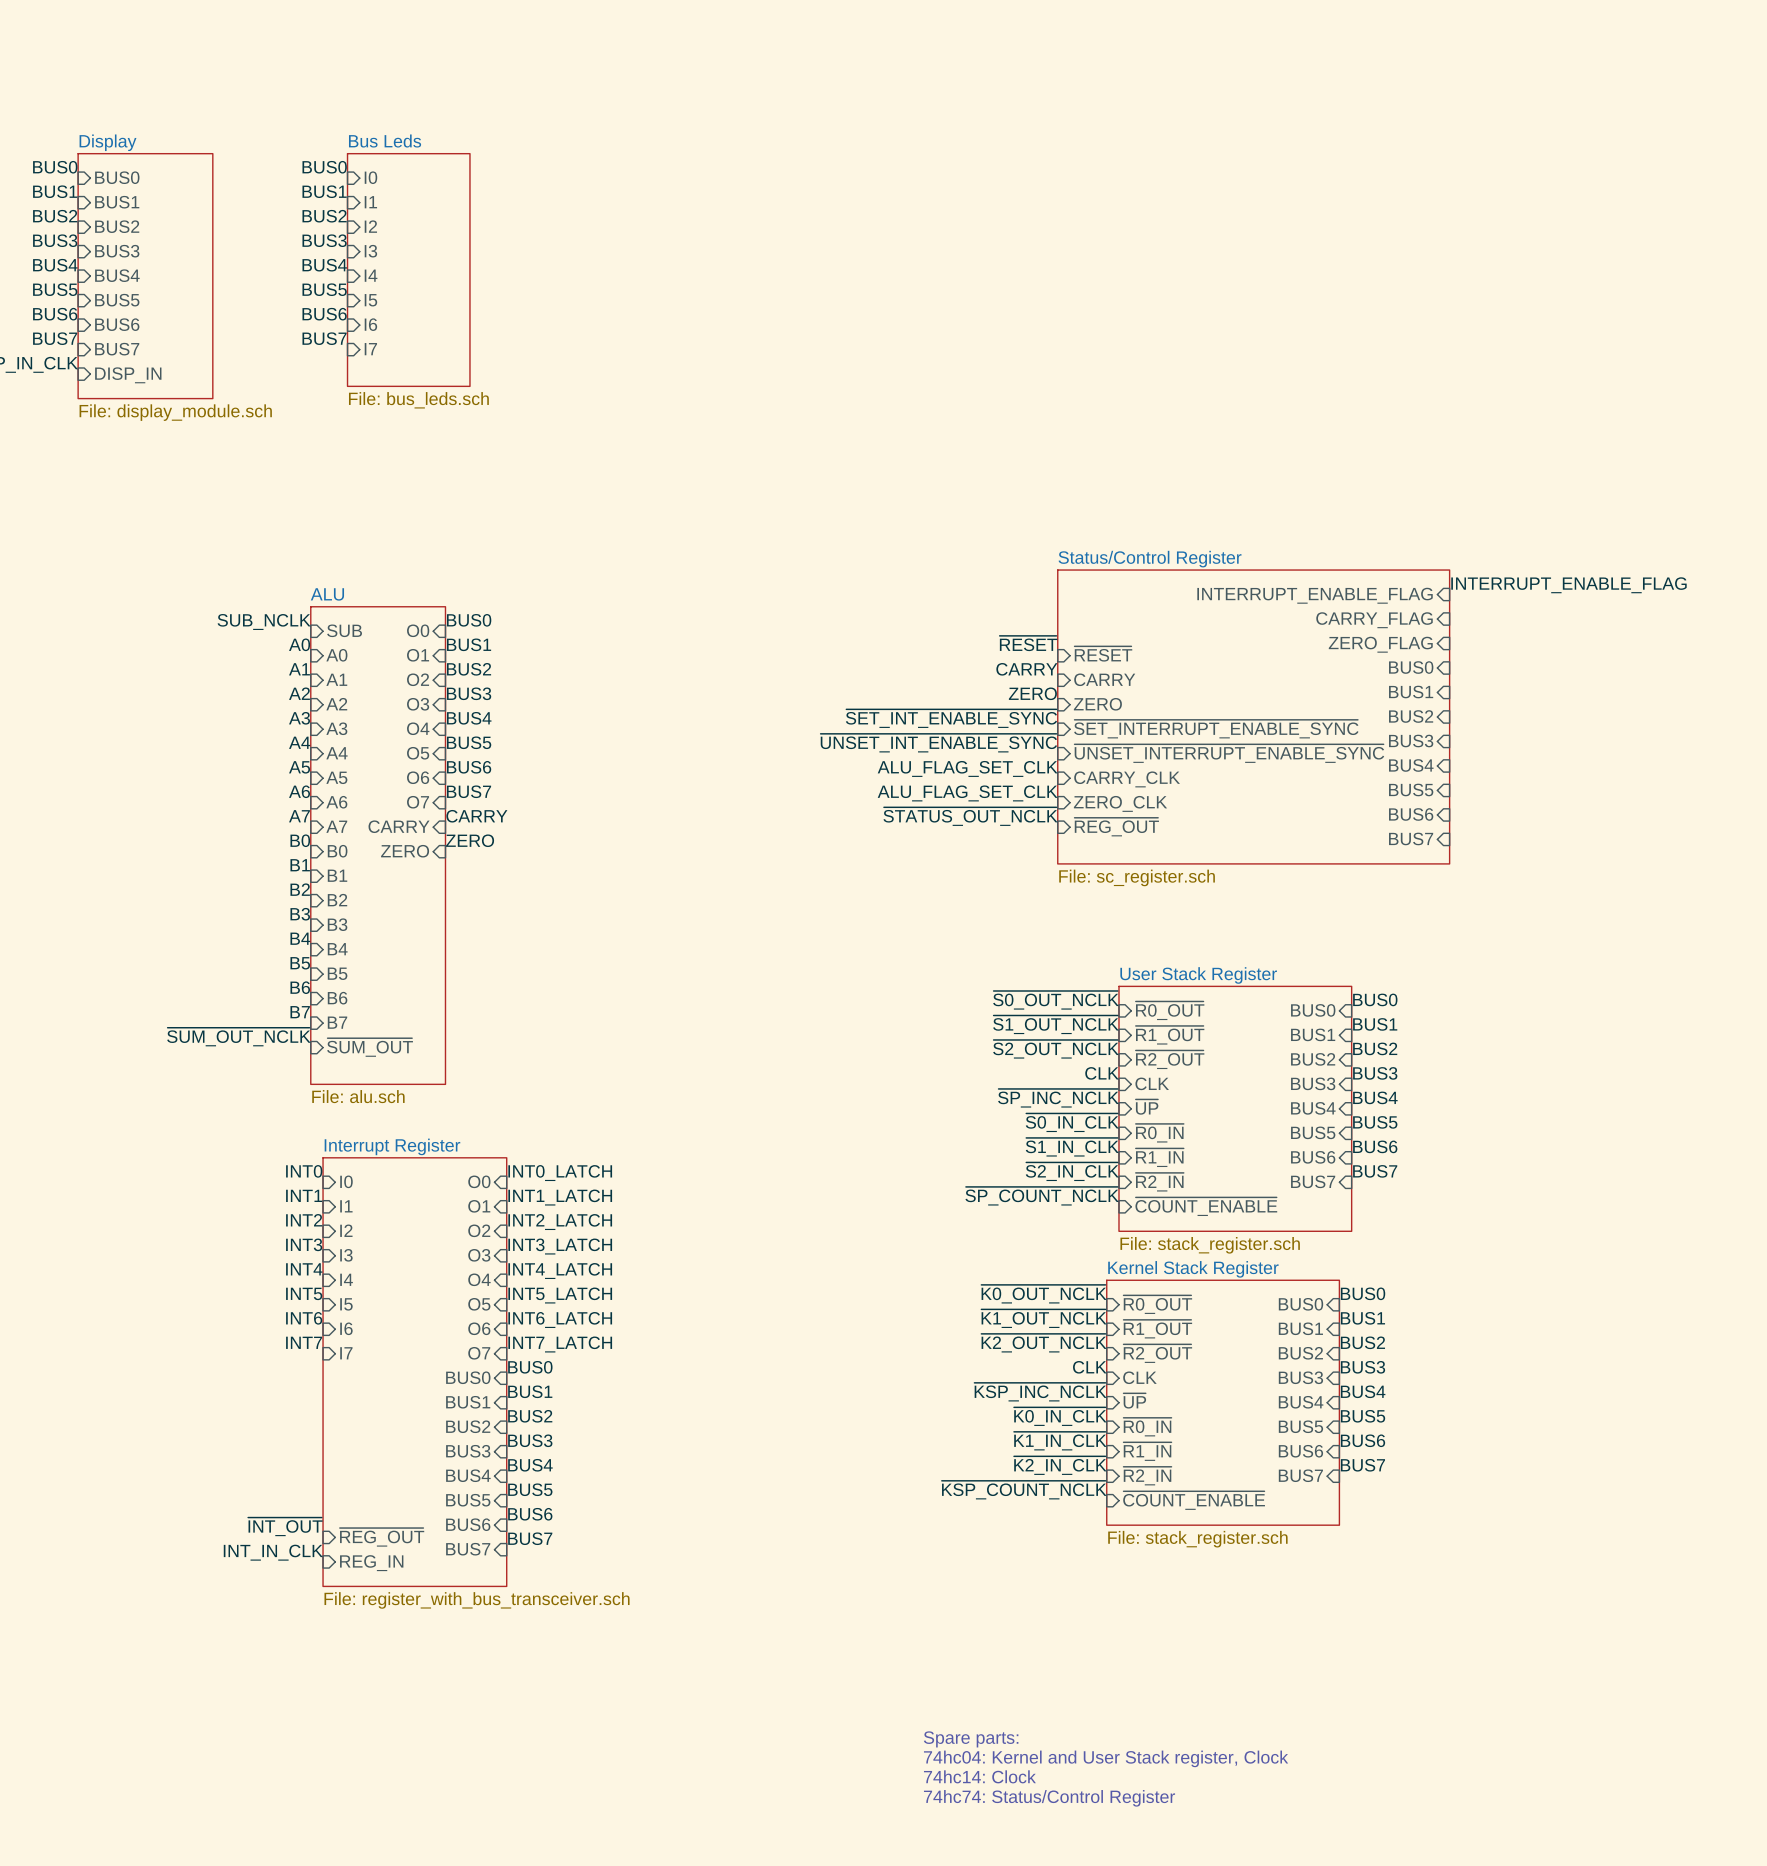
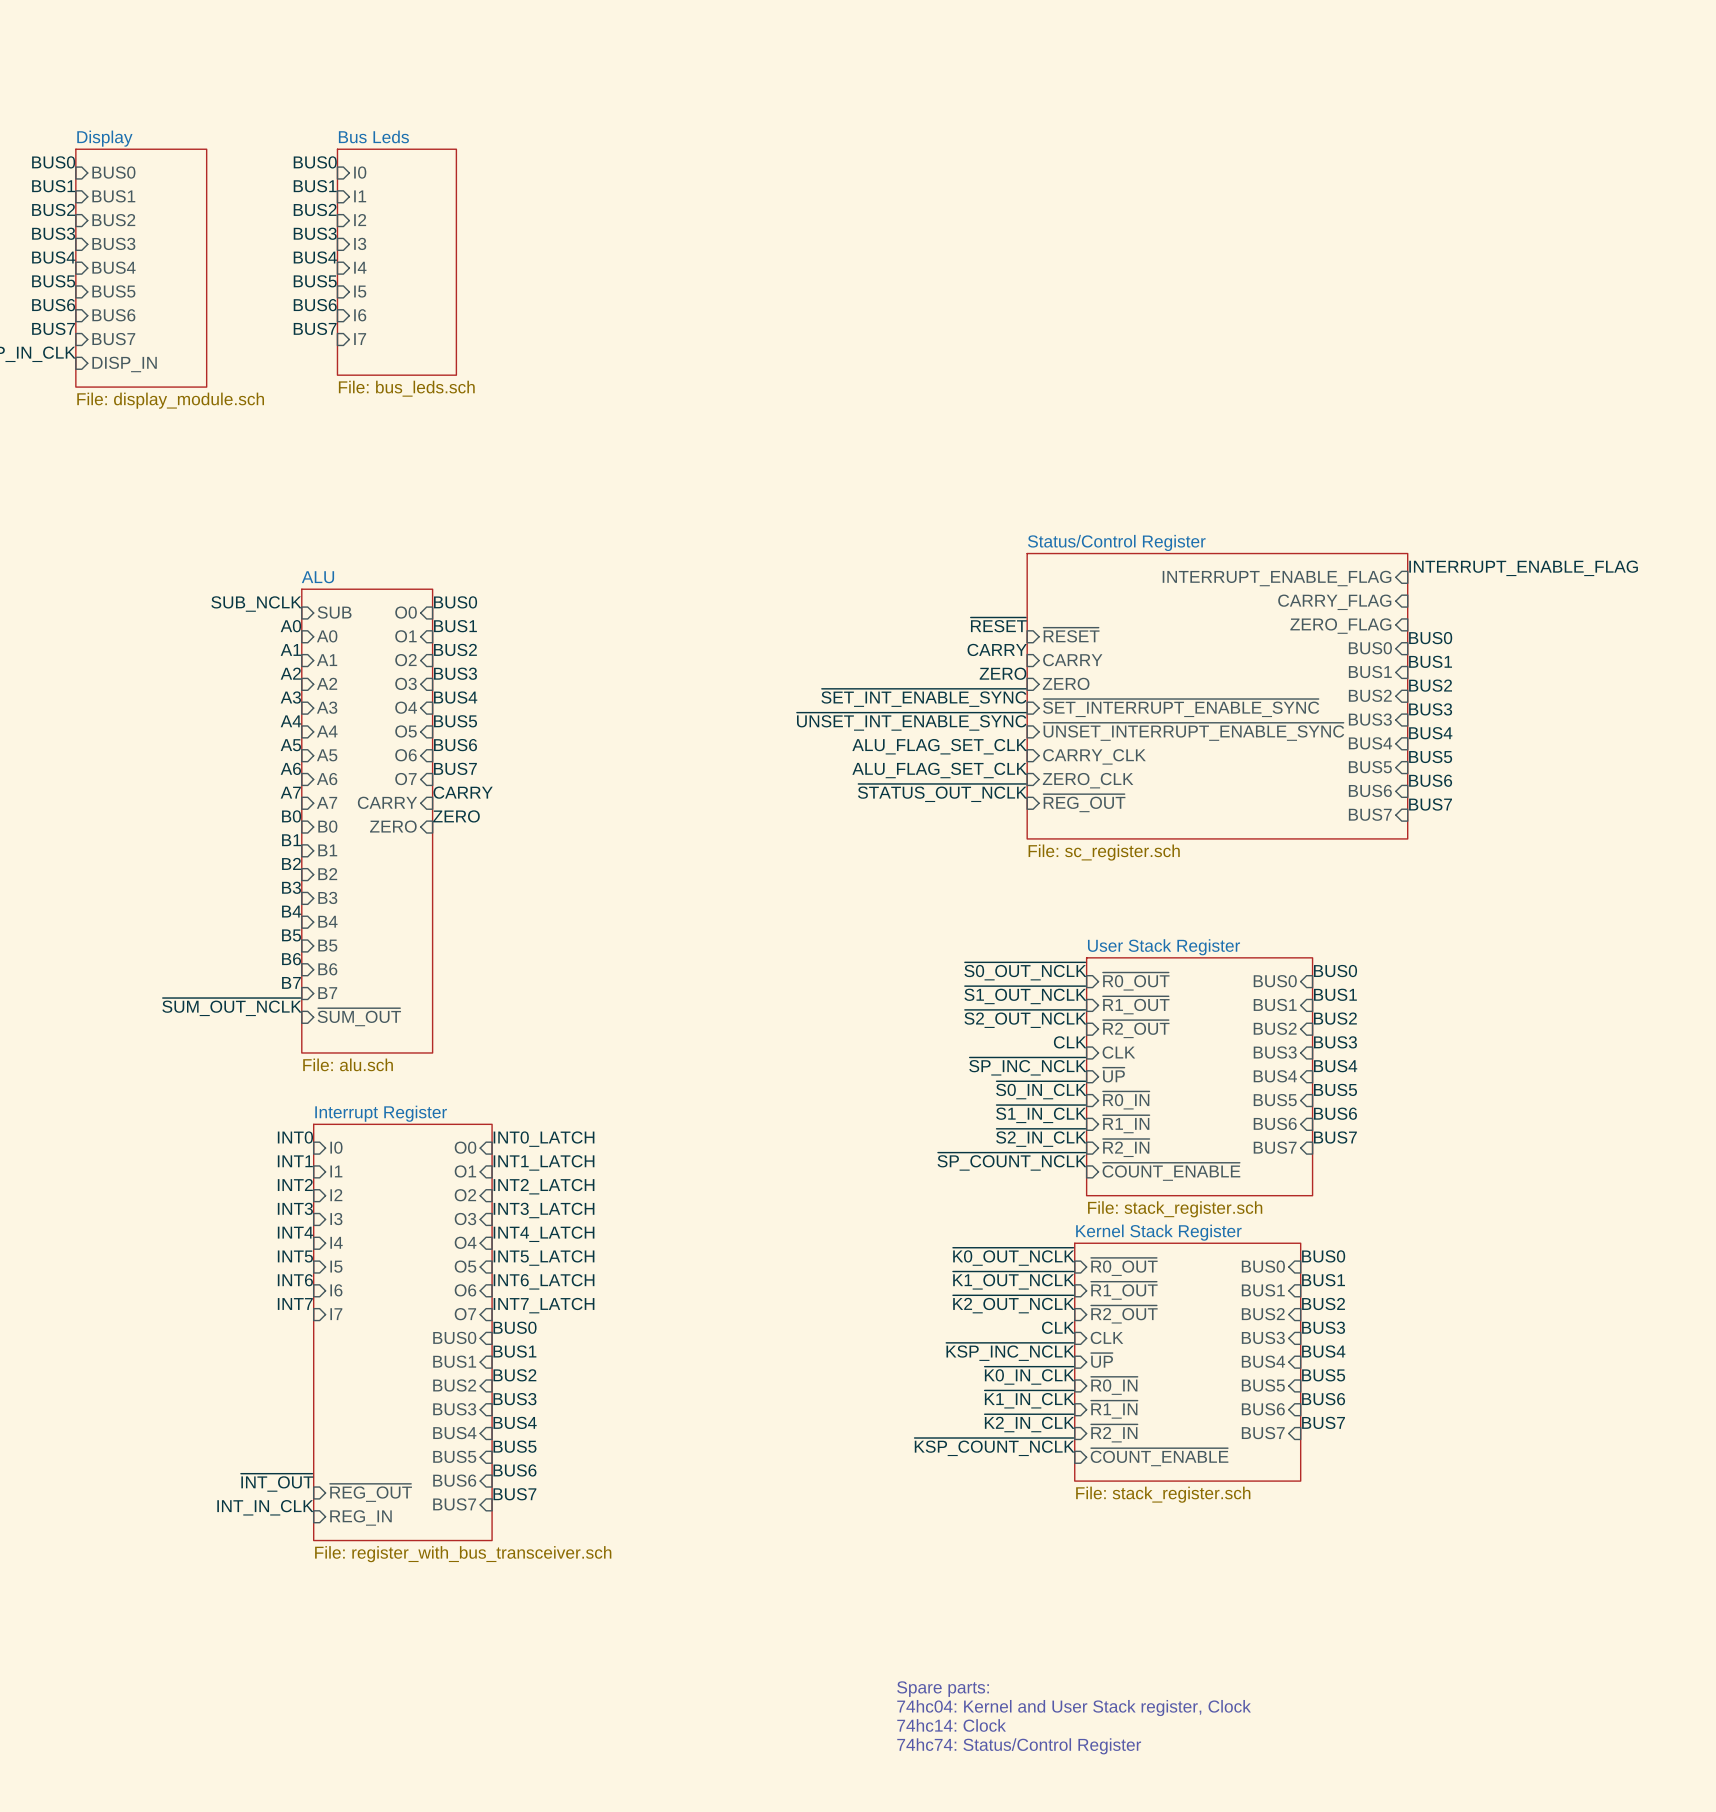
label: none -> BUS0 (1430, 638)
label: none -> BUS1 (1430, 661)
label: none -> BUS2 (1430, 685)
label: none -> BUS3 (1430, 709)
label: none -> BUS4 (1430, 733)
label: none -> BUS5 (1430, 756)
label: none -> BUS6 (1430, 780)
label: none -> BUS7 (1430, 804)

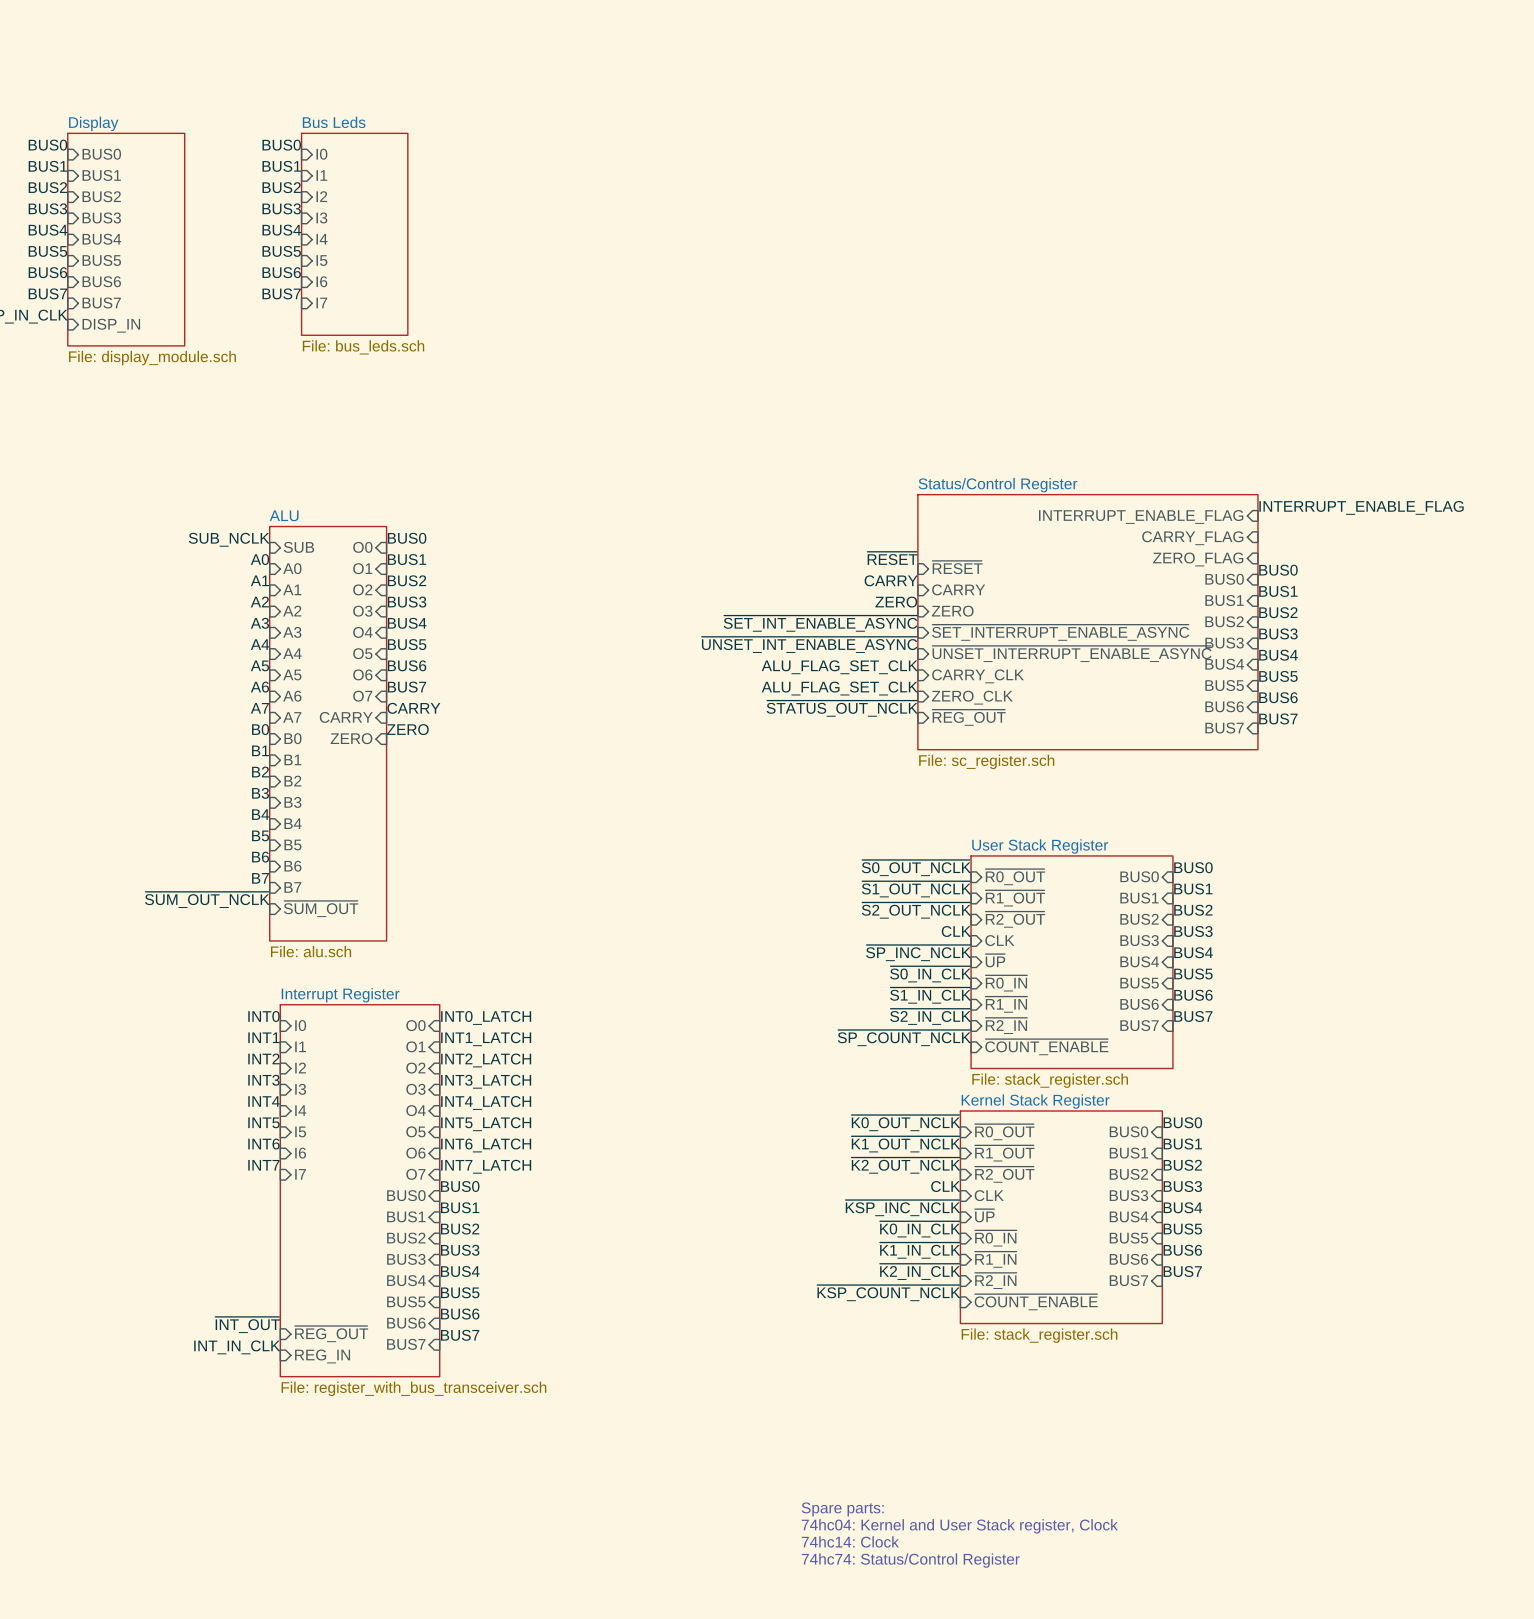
label: ~{SET_INT_ENABLE_SYNC} (923, 697) -> ~{SET_INT_ENABLE_ASYNC} (820, 623)
sheet pin: ~{SET_INTERRUPT_ENABLE_SYNC} (1181, 708) -> ~{SET_INTERRUPT_ENABLE_ASYNC} (1060, 632)
label: ~{UNSET_INT_ENABLE_SYNC} (911, 721) -> ~{UNSET_INT_ENABLE_ASYNC} (809, 644)
sheet pin: ~{UNSET_INTERRUPT_ENABLE_SYNC} (1193, 731) -> ~{UNSET_INTERRUPT_ENABLE_ASYNC} (1071, 653)

